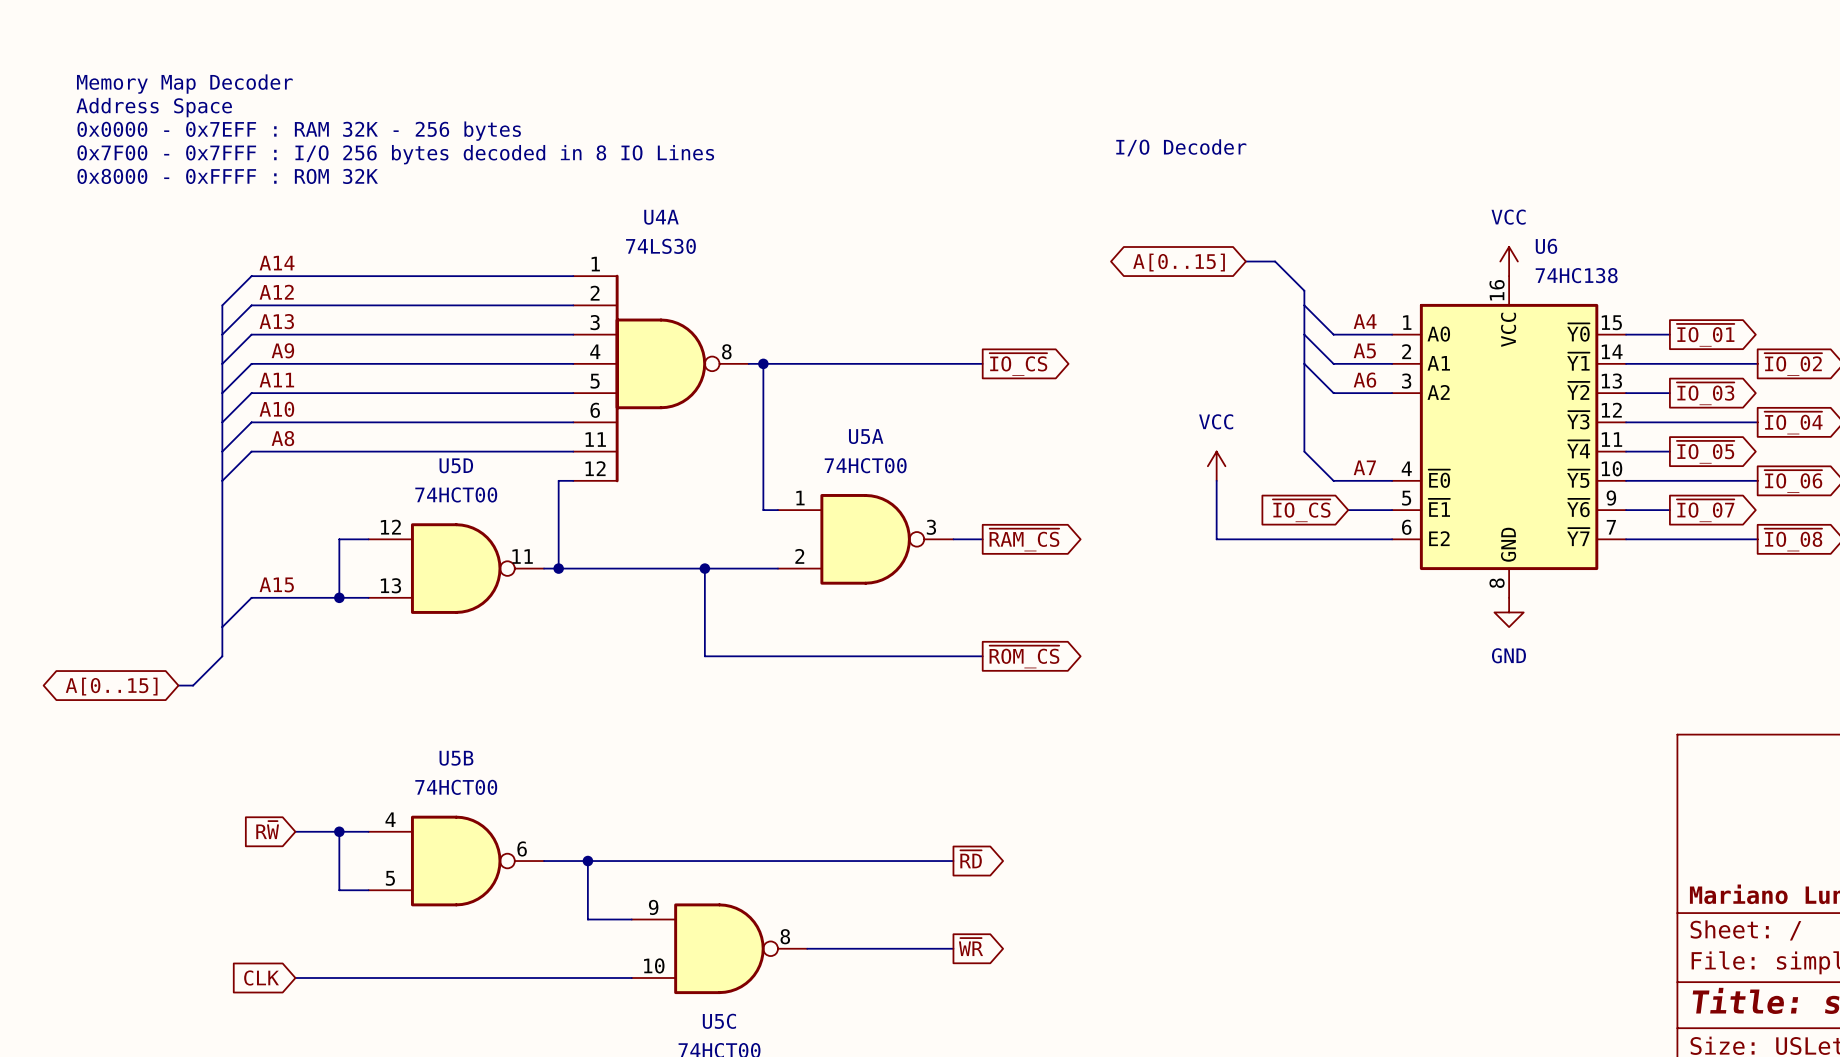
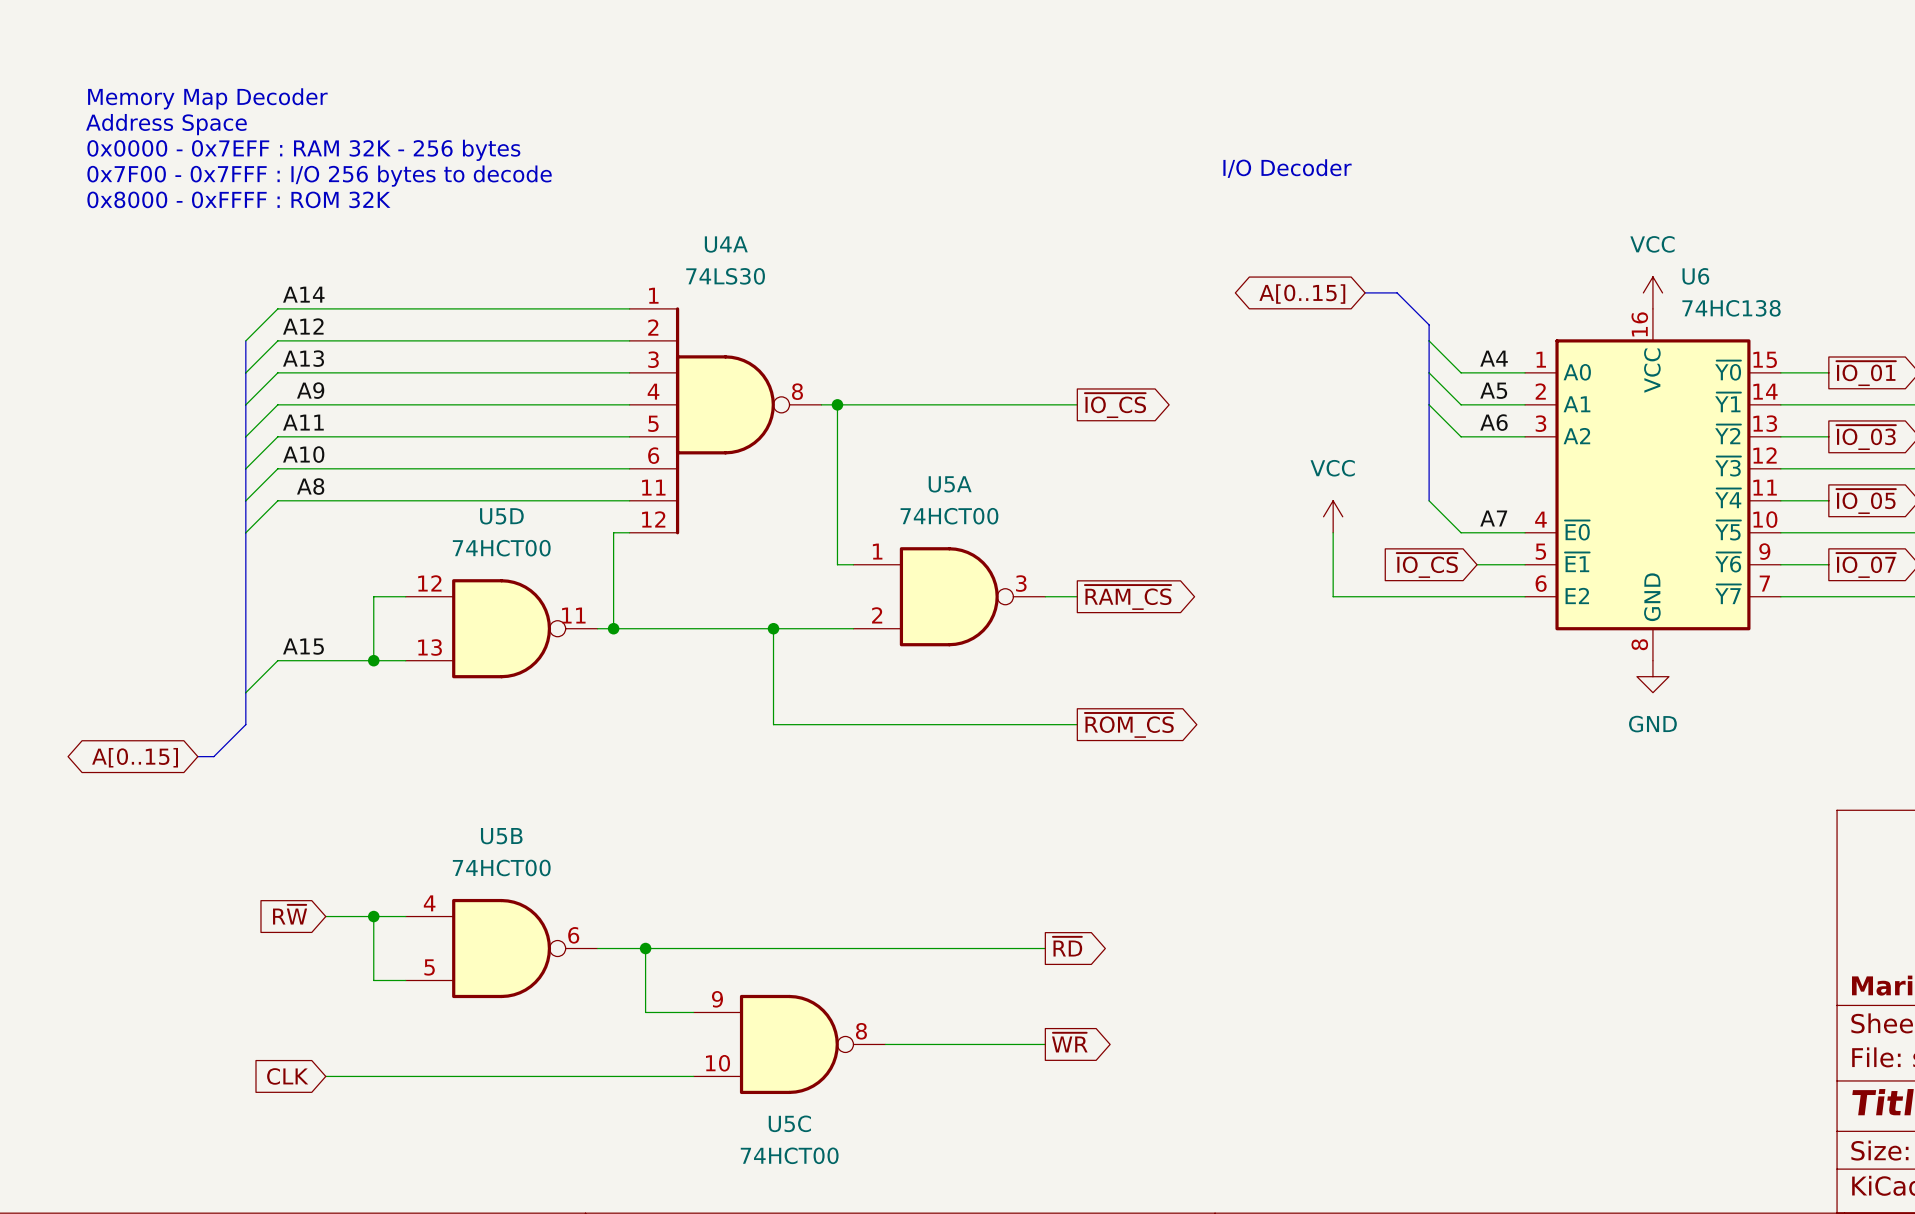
text: 0x7F00 - 0x7FFF : I/O 256 bytes decoded in 8 IO Lines (395, 154) -> 0x7F00 - 0x7FFF : I/O 256 bytes to decode (319, 176)

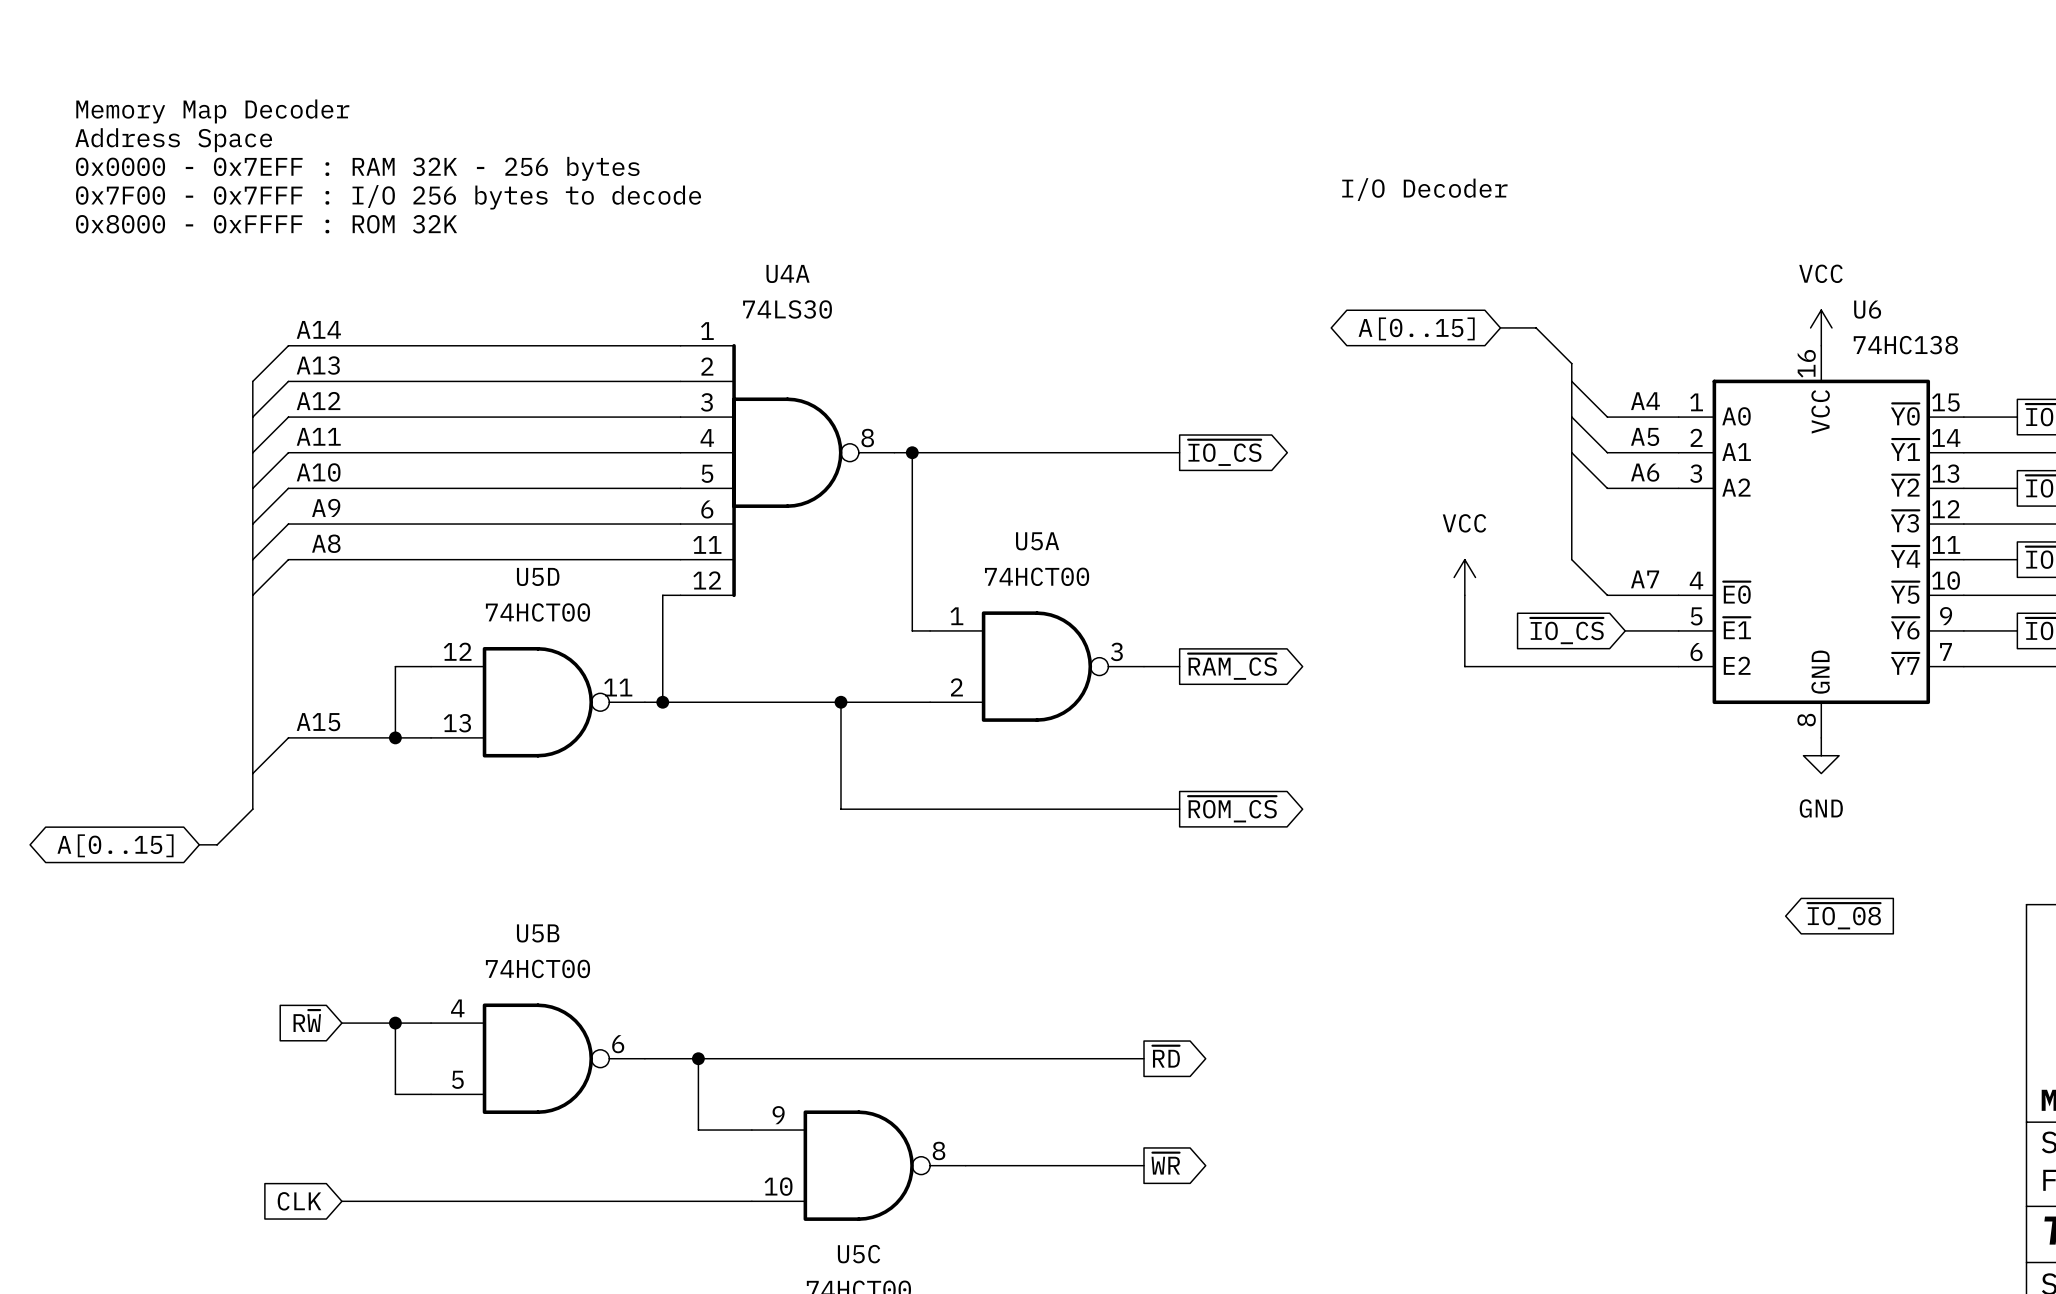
label: A12 (303, 326) -> A13 (318, 365)
label: A13 (303, 358) -> A12 (318, 401)
label: A9 (310, 390) -> A11 (318, 436)
label: A11 (303, 422) -> A10 (318, 472)
label: A10 (303, 454) -> A9 (326, 507)
global label: none -> ~{IO_08} (1844, 916)

